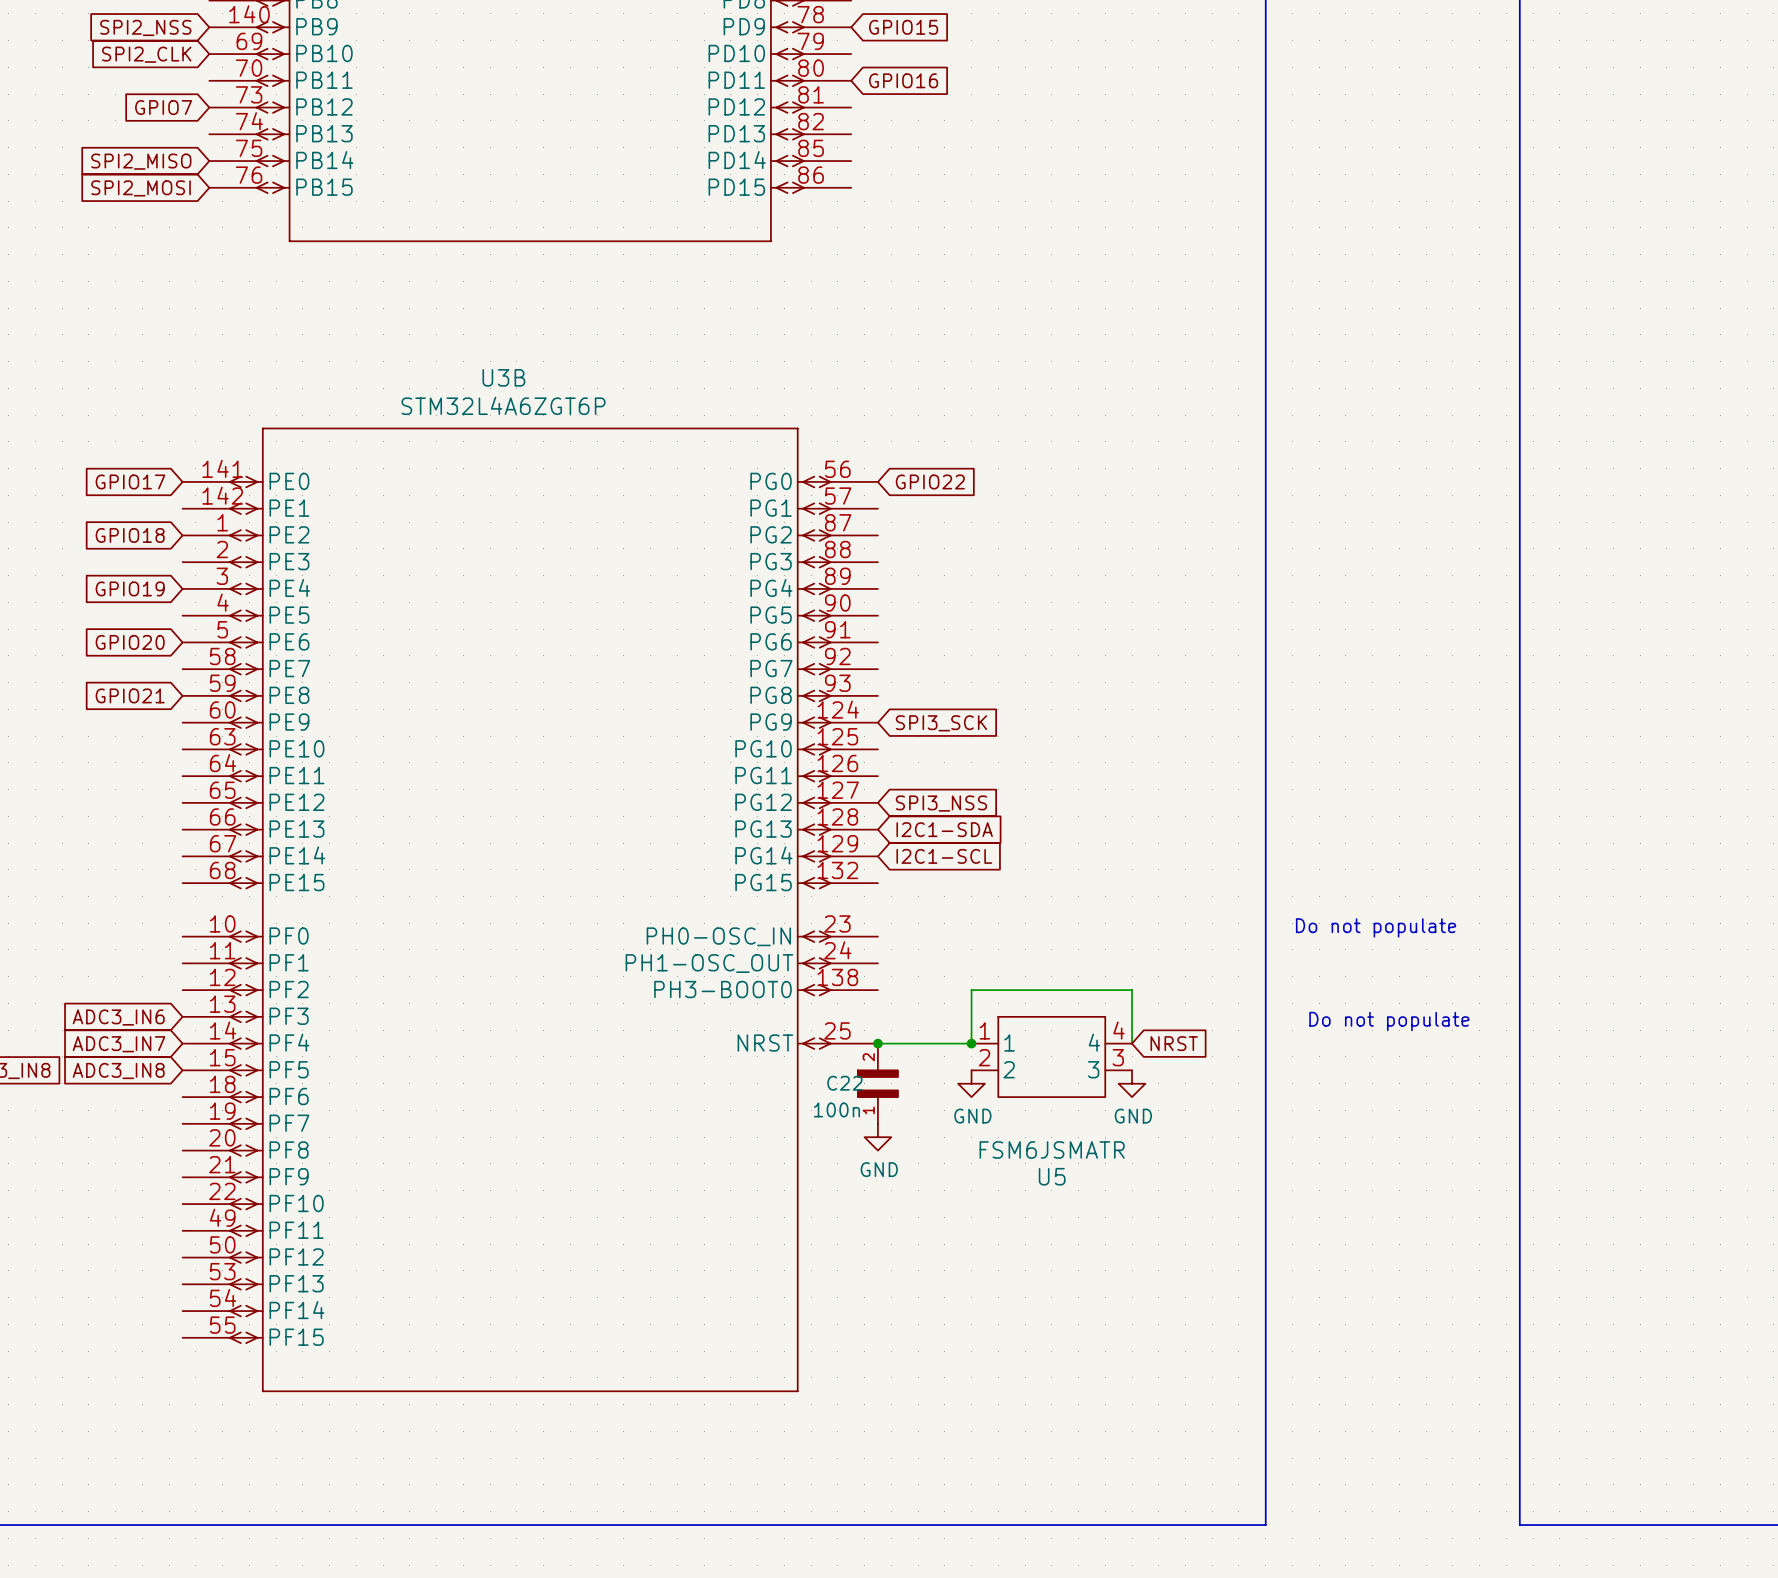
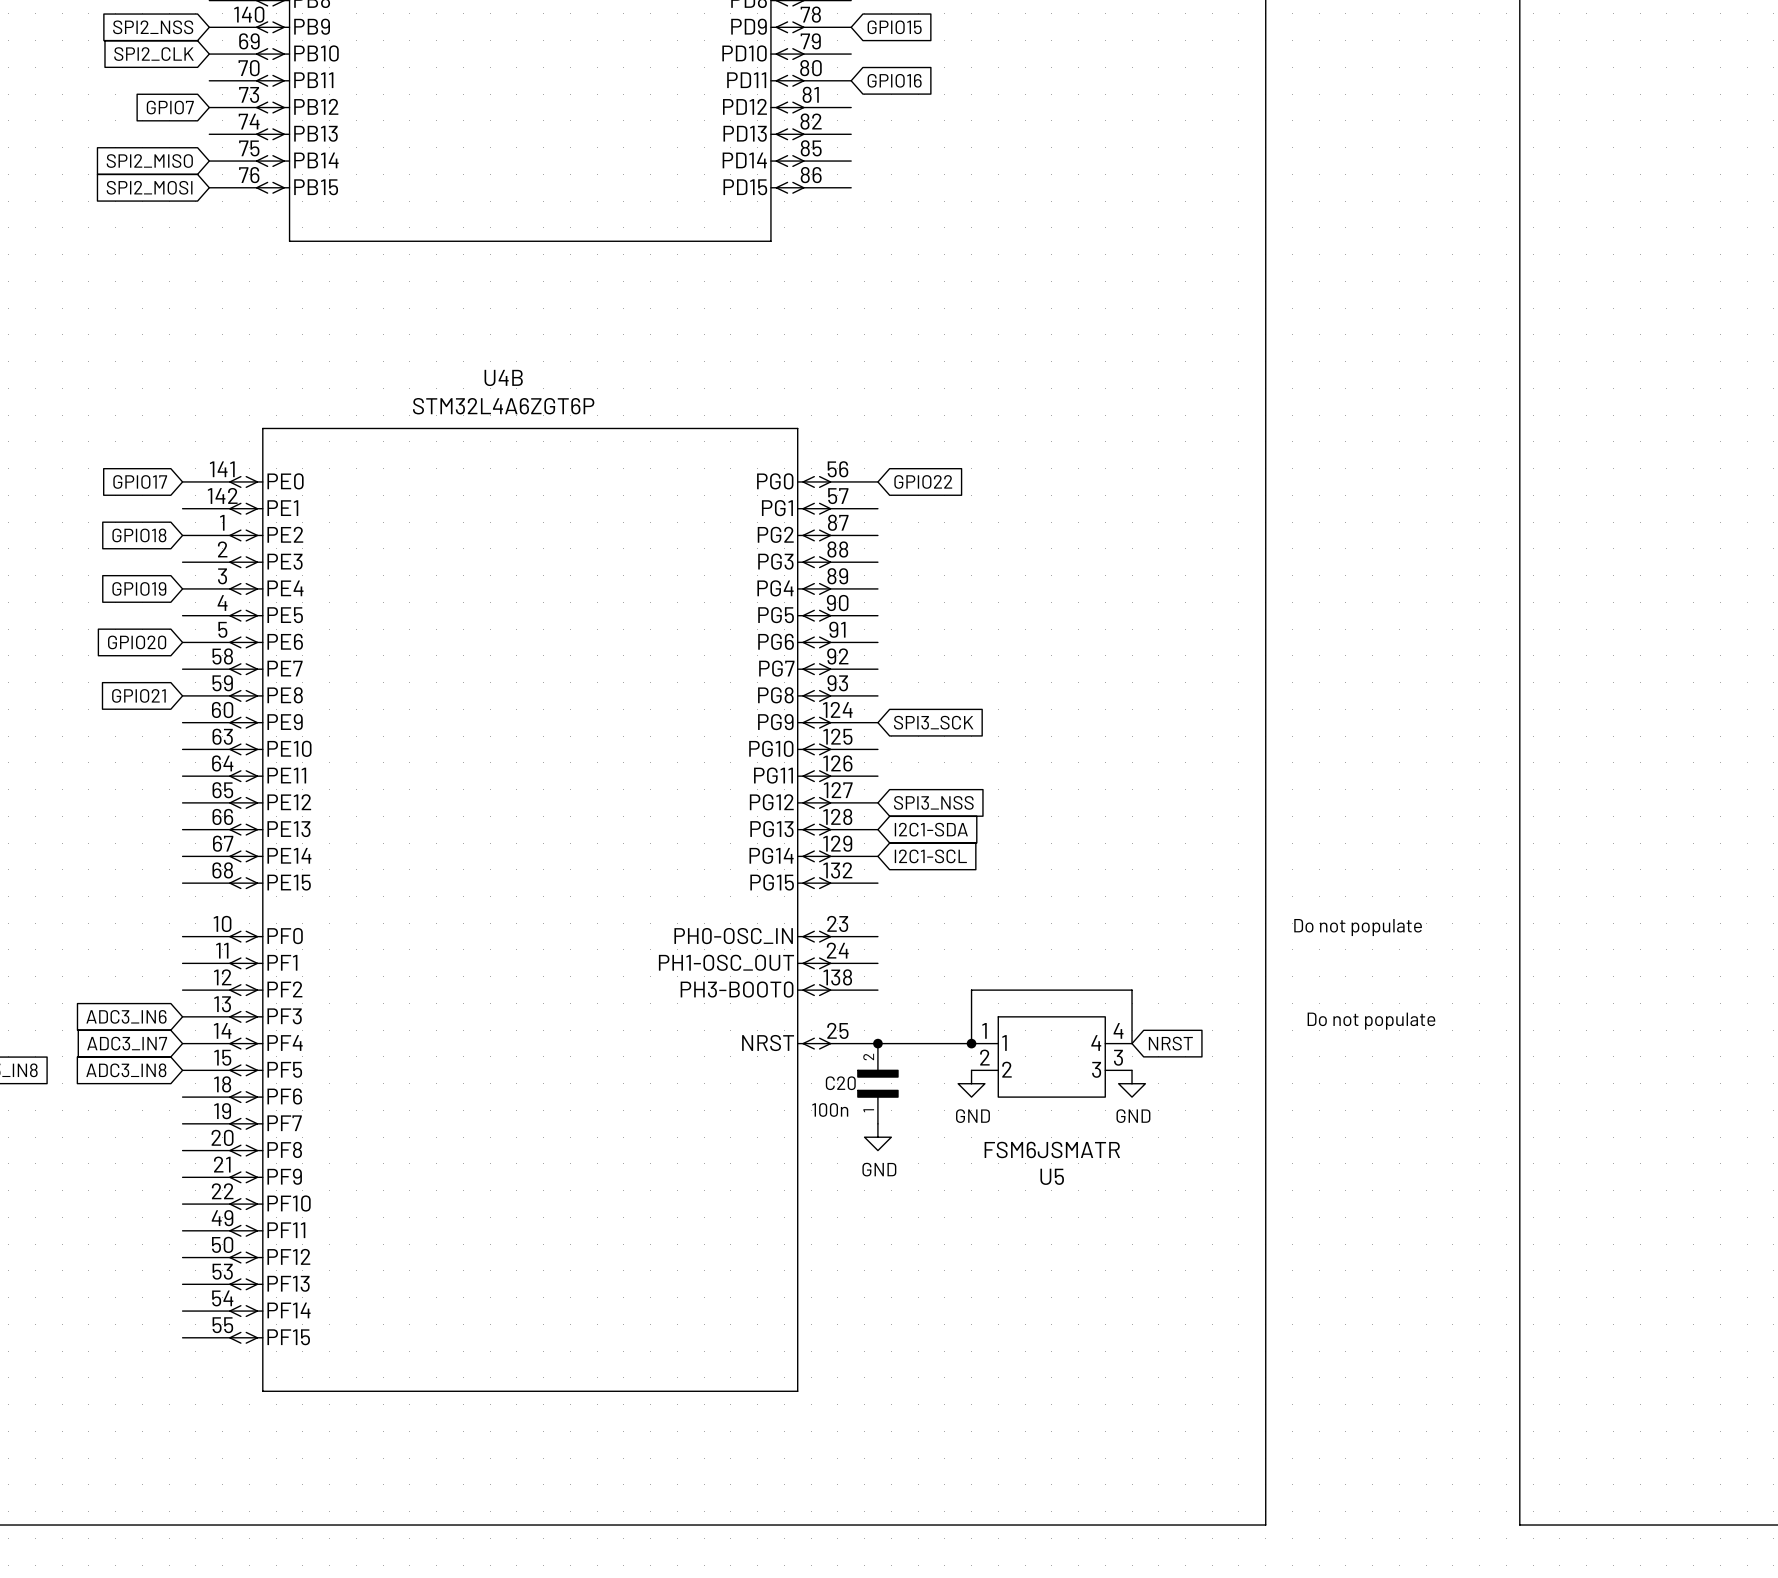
U3B name: U3B (503, 377) -> U4B (503, 377)
C22 name: C22 (844, 1083) -> C20 (840, 1083)

